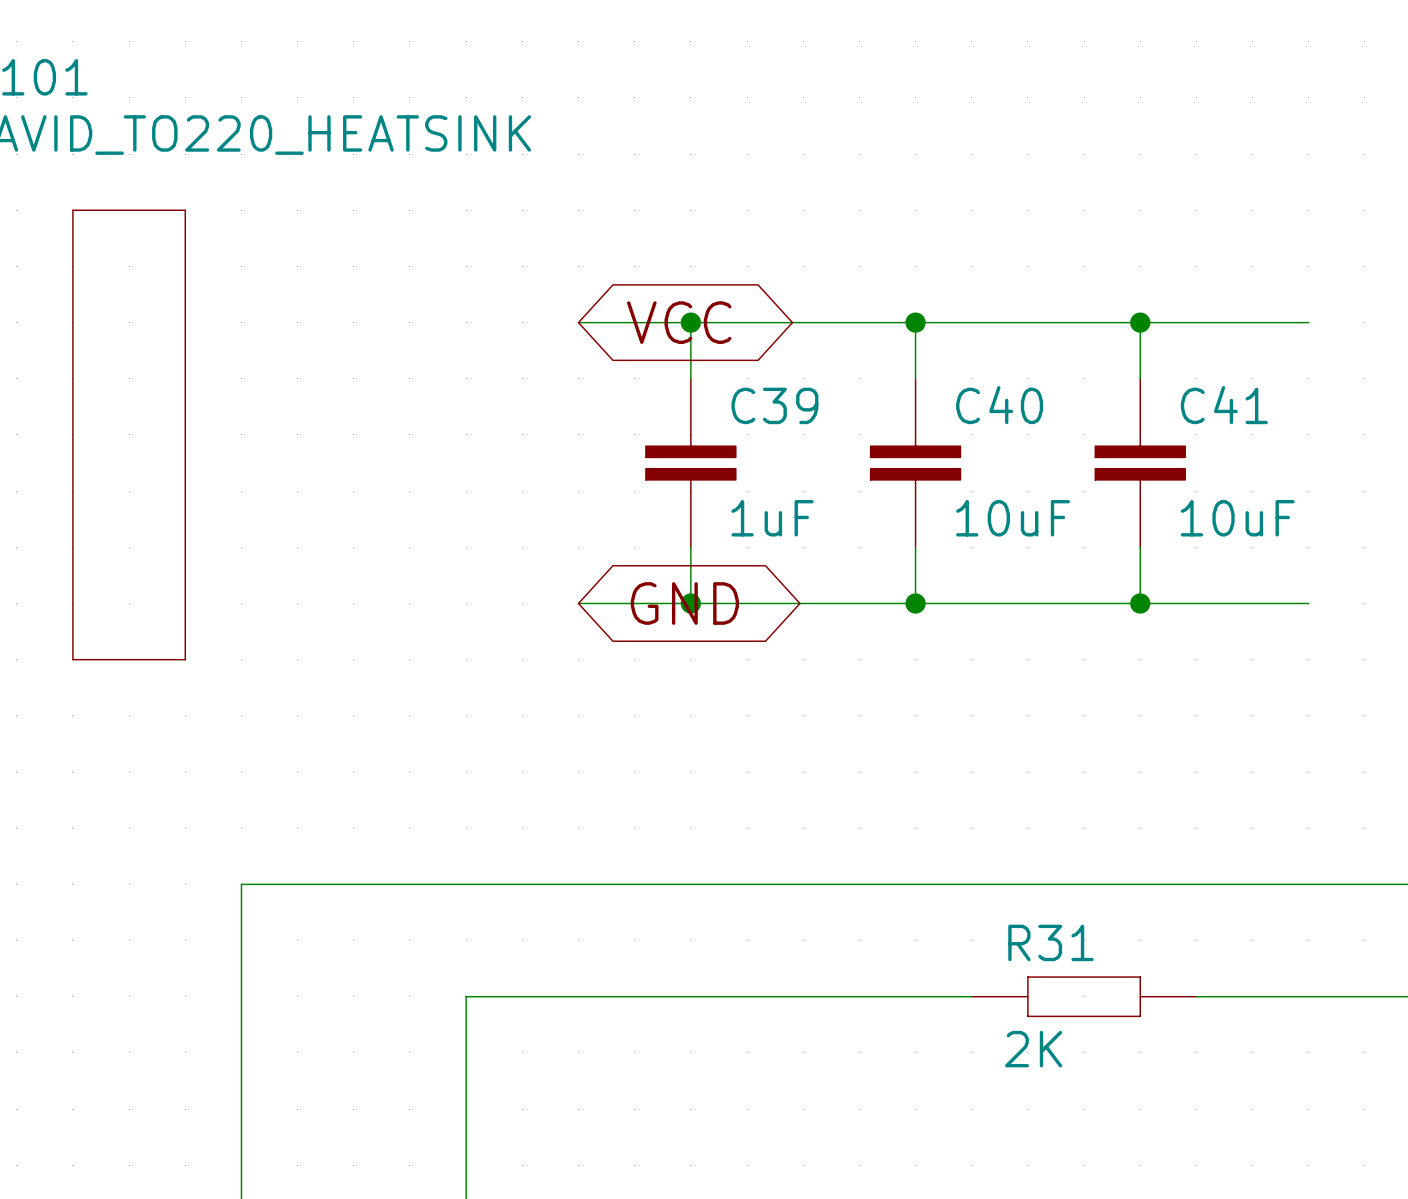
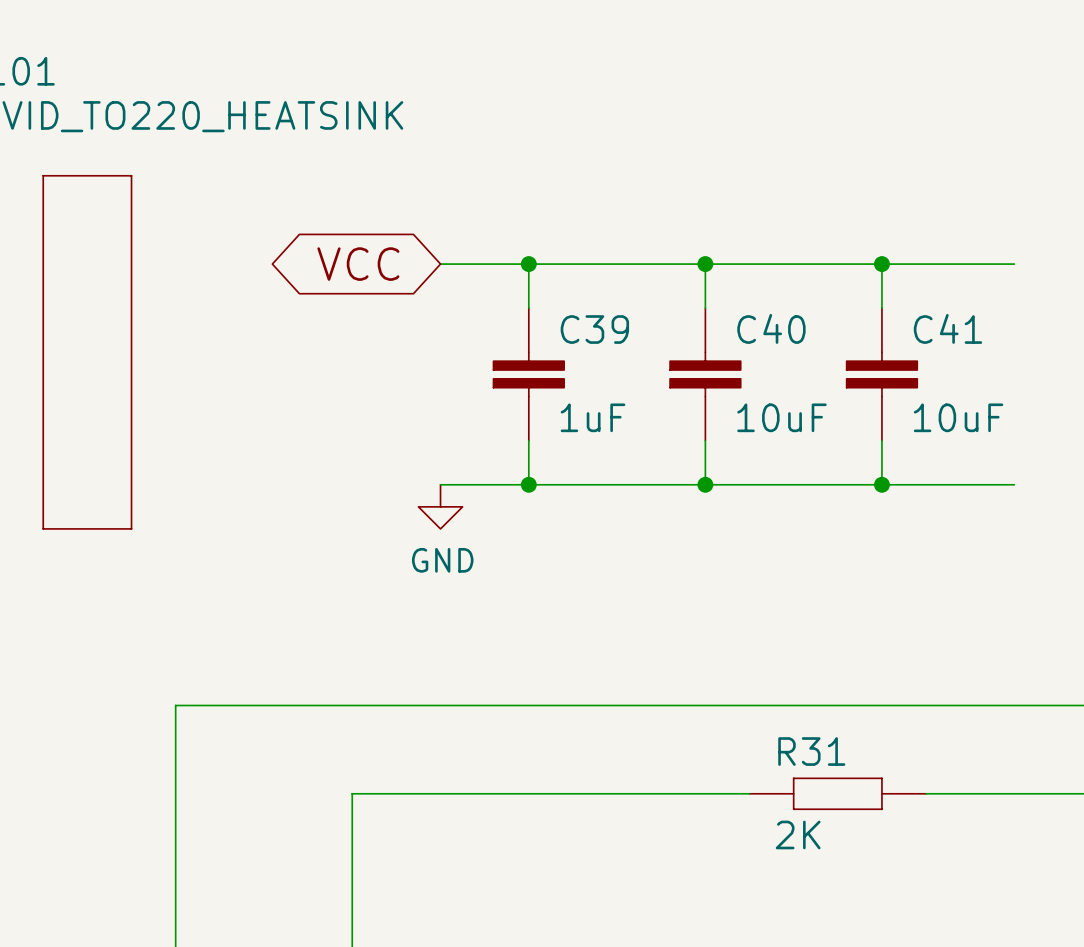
global label rotation: 0° (679, 322) -> 180° (358, 264)
global label position: VCC (679, 322) -> VCC (358, 264)
global label: GND (684, 603) -> none
power symbol: none -> GND (440, 506)

